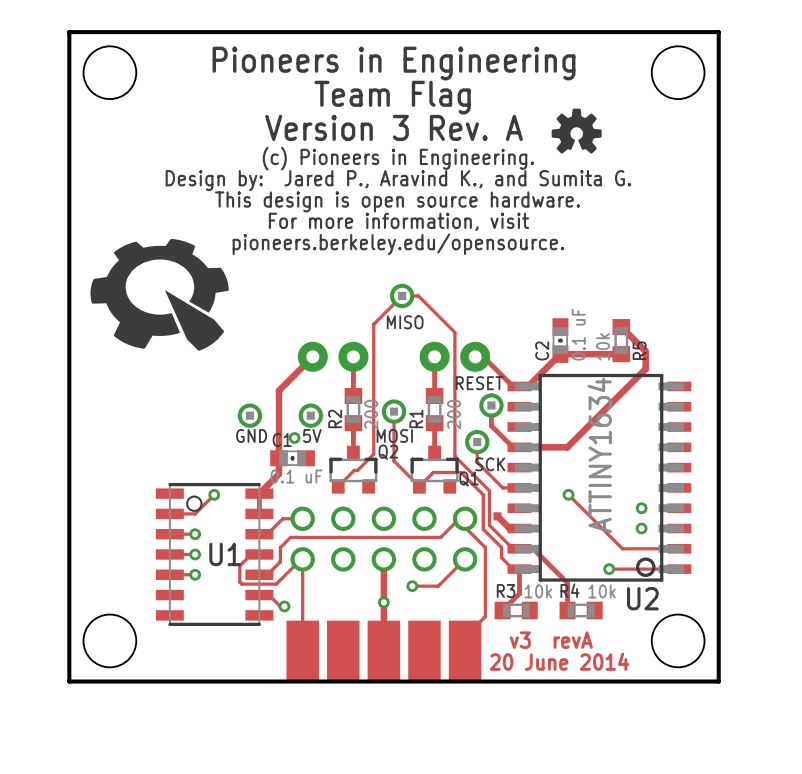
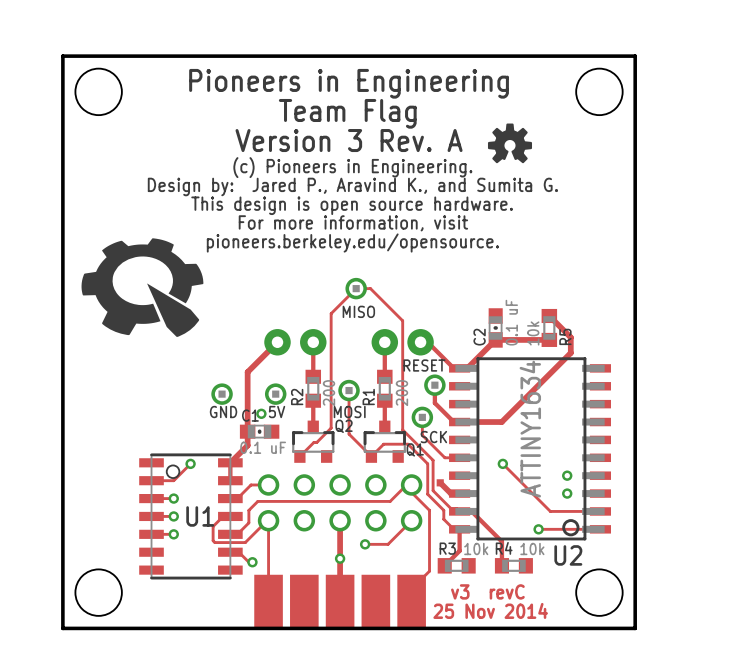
text: v3 revA (551, 640) -> v3 revC (487, 591)
text: 20 June 2014 (559, 661) -> 25 Nov 2014 (490, 610)

